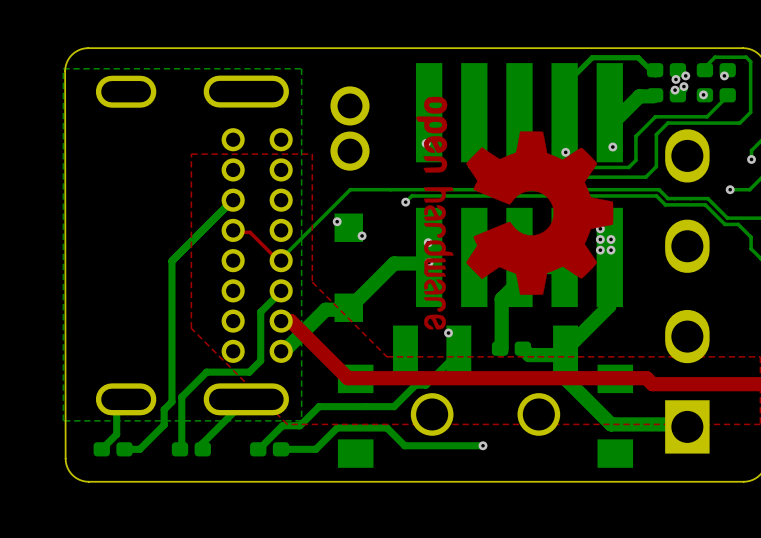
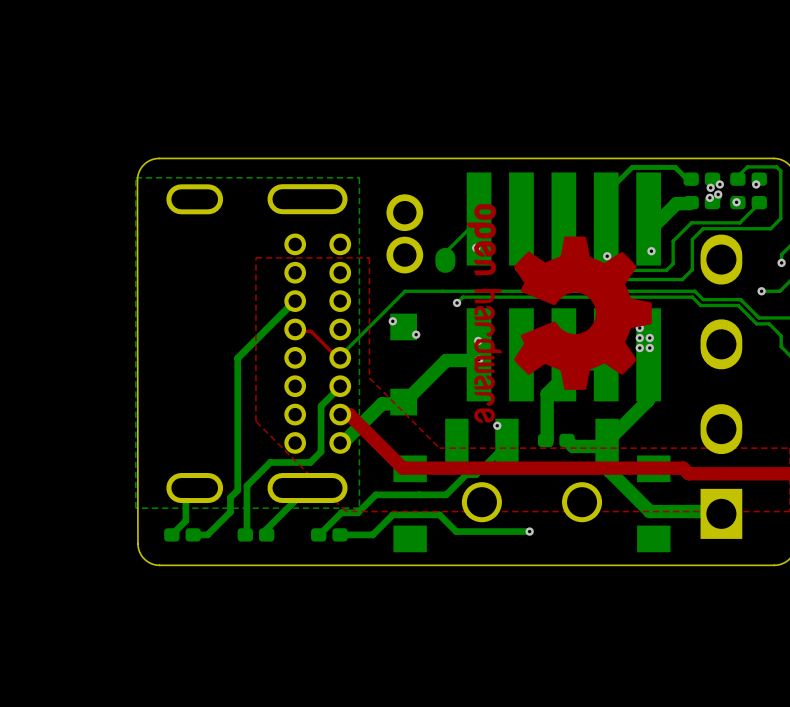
bottom track: none -> (479, 219) (444, 253)
part: none -> (445, 260)

